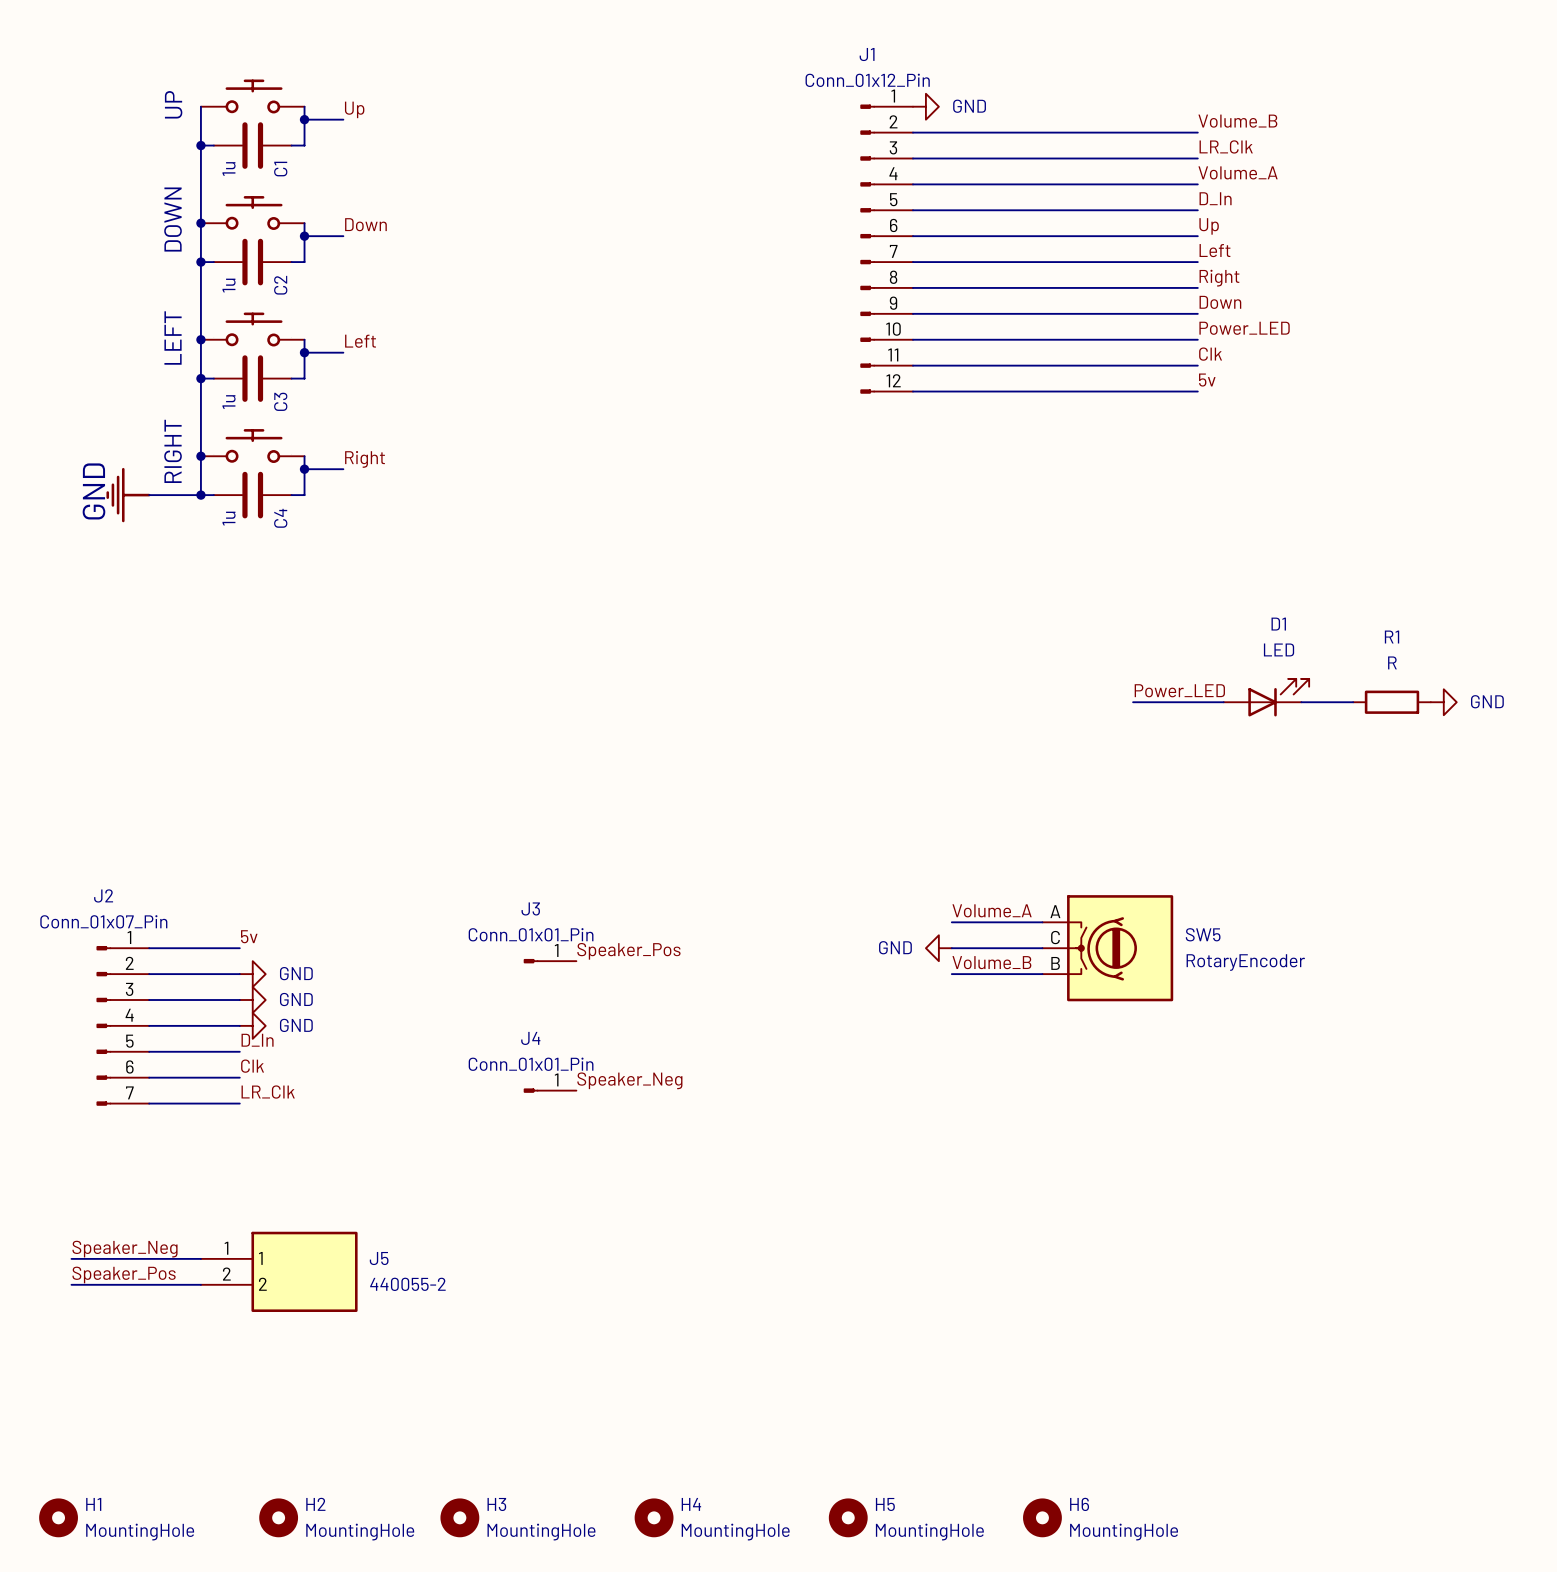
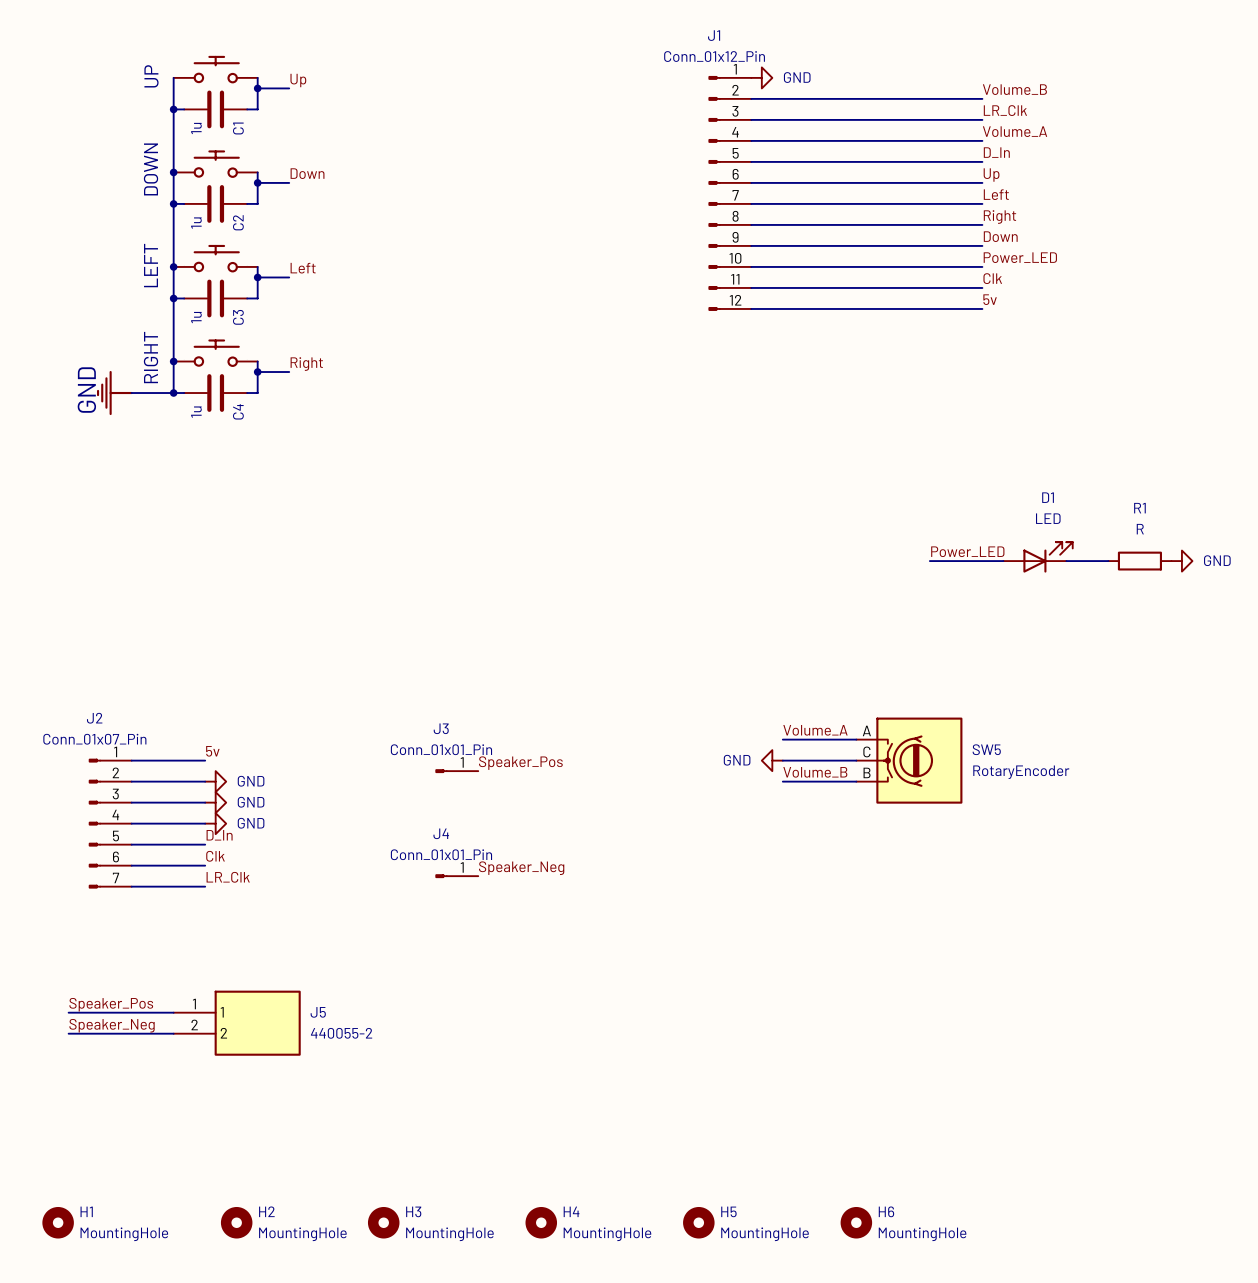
label: Speaker_Neg (125, 1249) -> Speaker_Pos (111, 1004)
label: Speaker_Pos (124, 1274) -> Speaker_Neg (112, 1025)

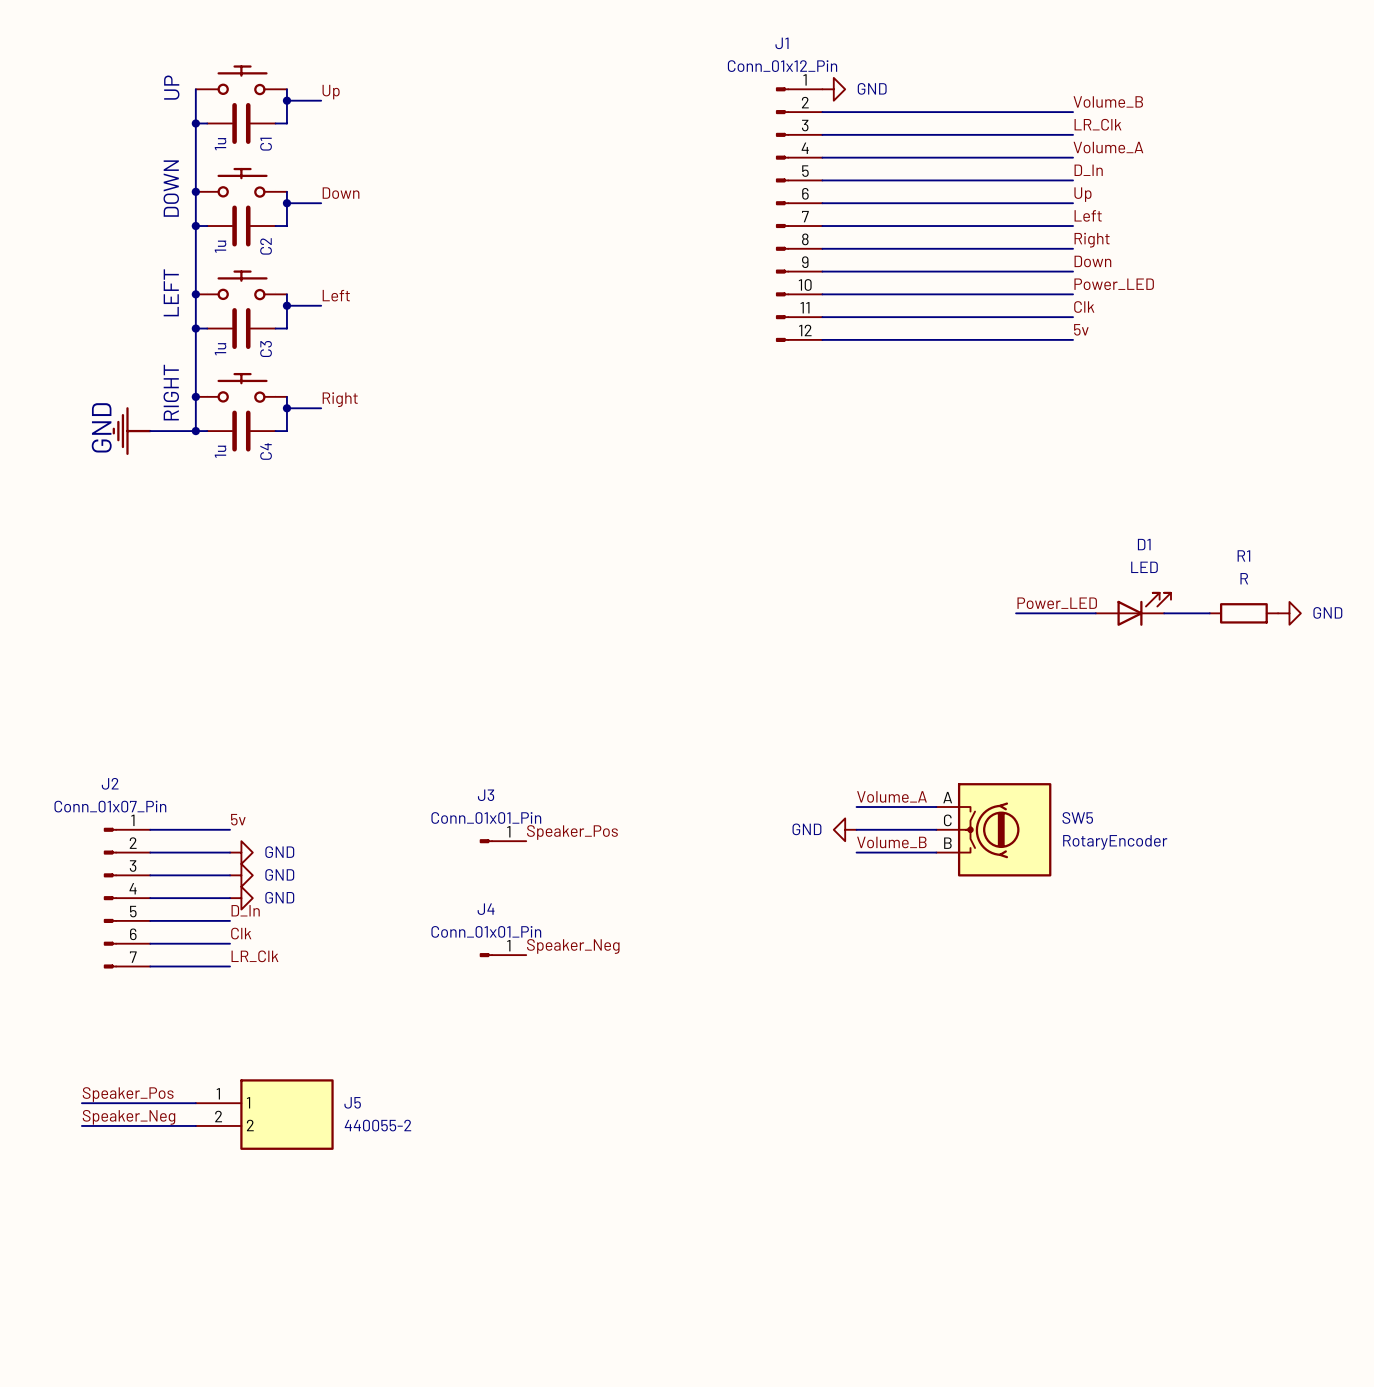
H1: MountingHole (58, 1222) -> none
H2: MountingHole (236, 1222) -> none
H3: MountingHole (383, 1222) -> none
H4: MountingHole (541, 1222) -> none
H5: MountingHole (698, 1222) -> none
H6: MountingHole (856, 1222) -> none

